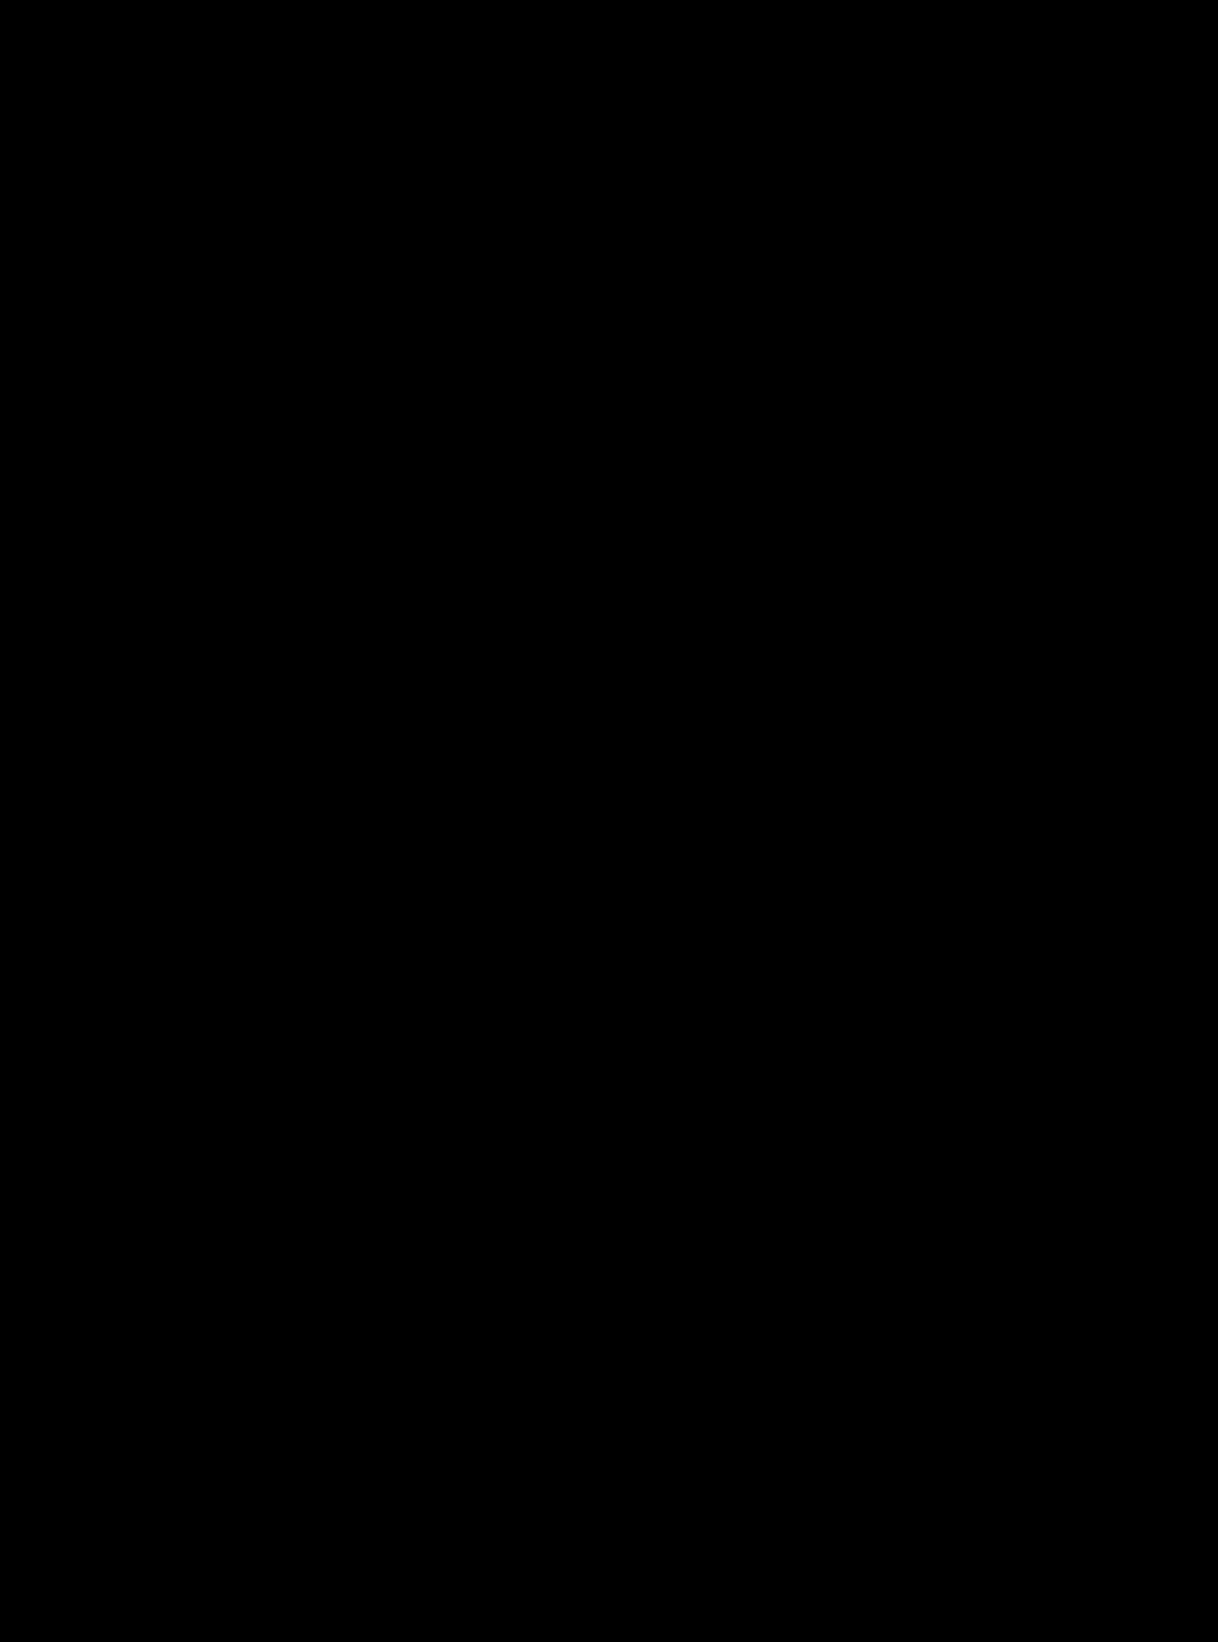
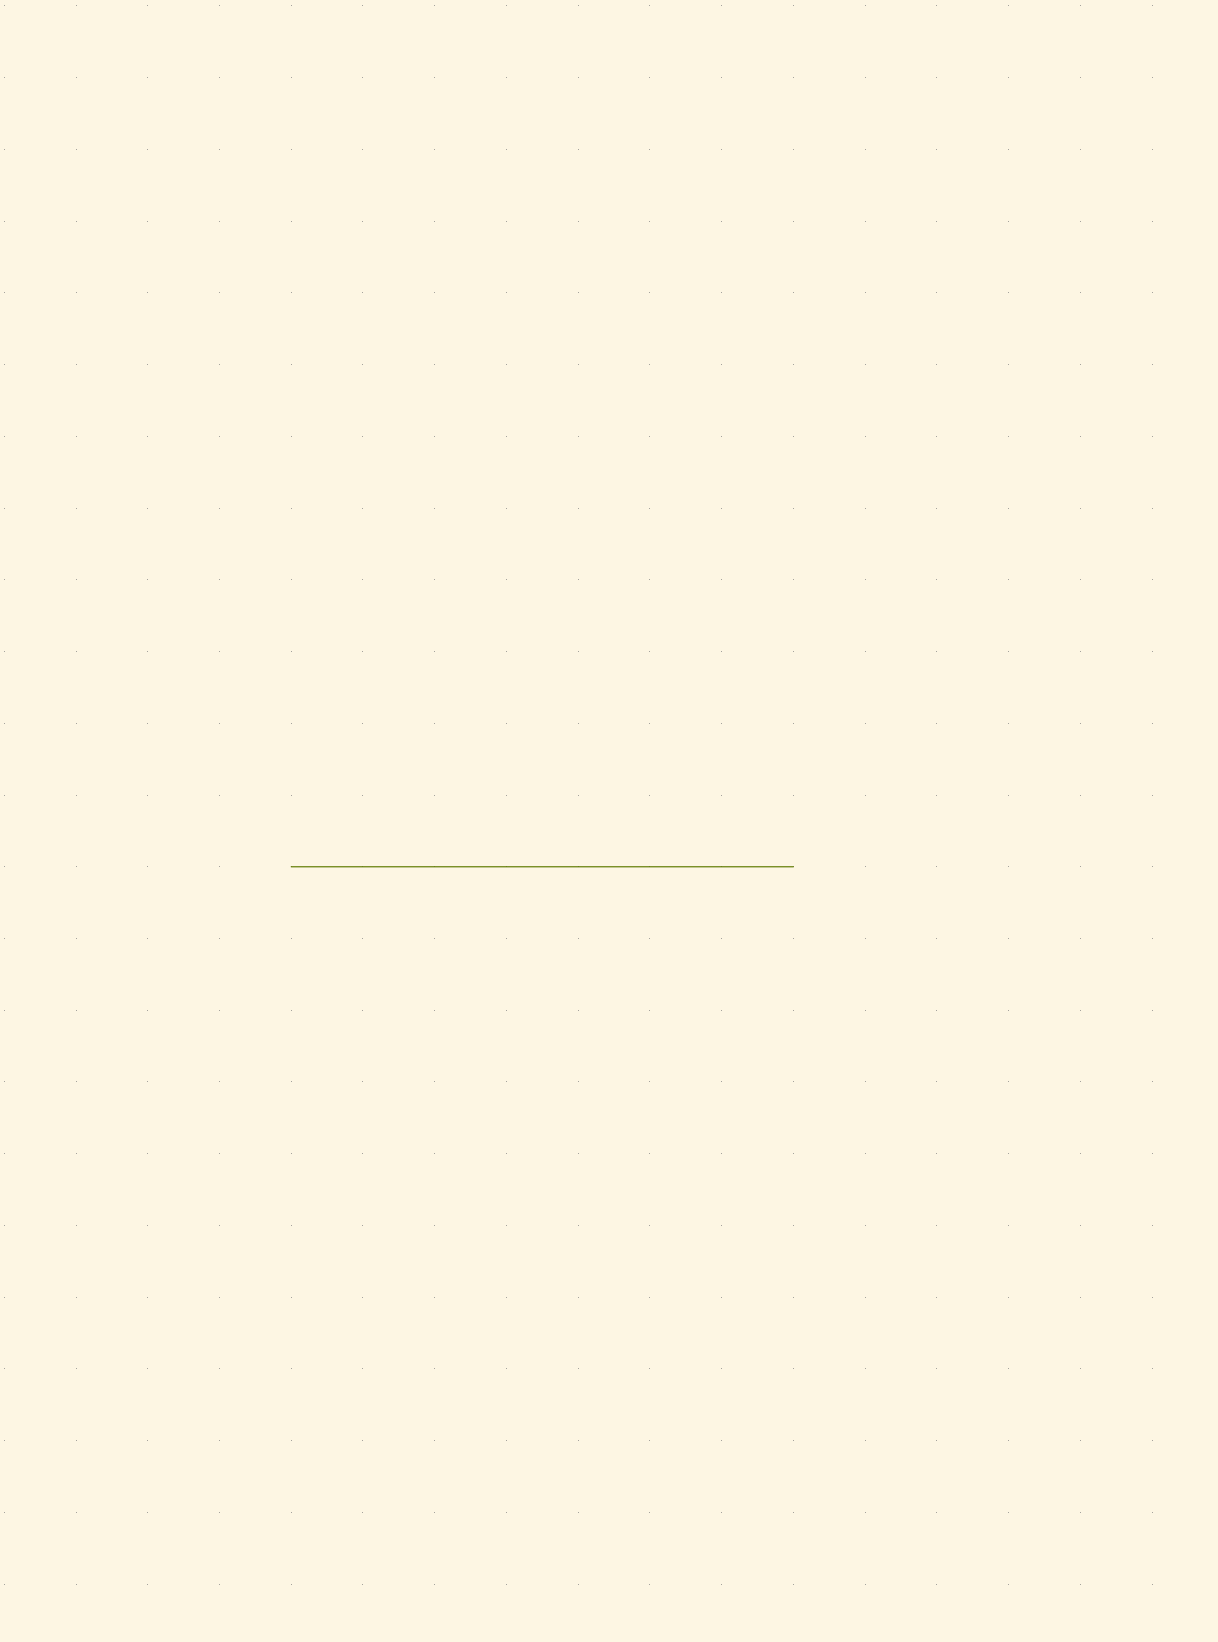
wire: none -> (291, 866) (793, 866)

